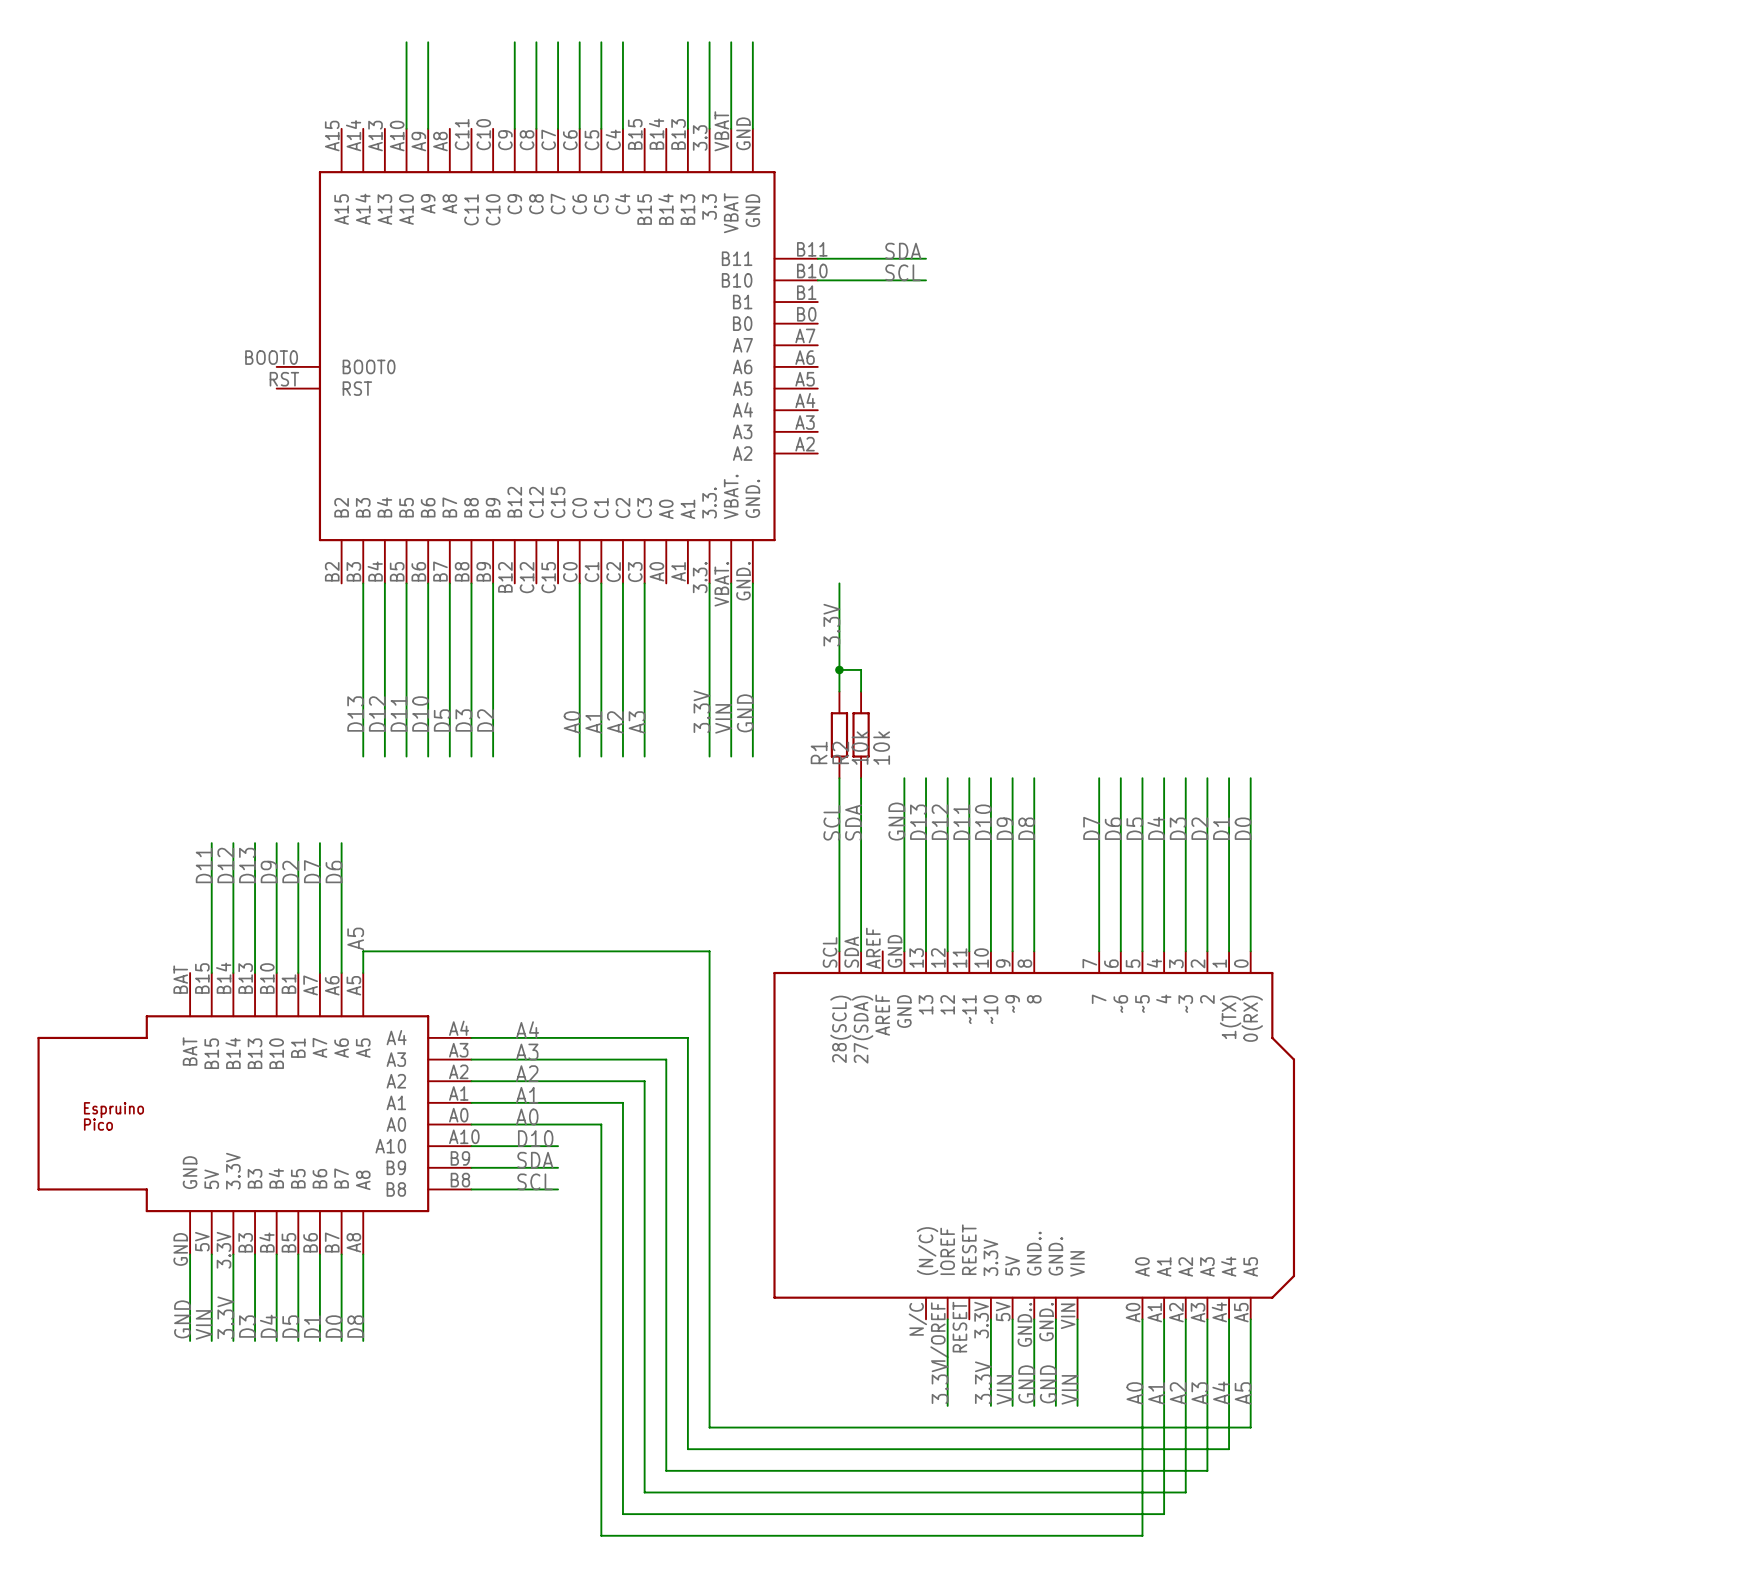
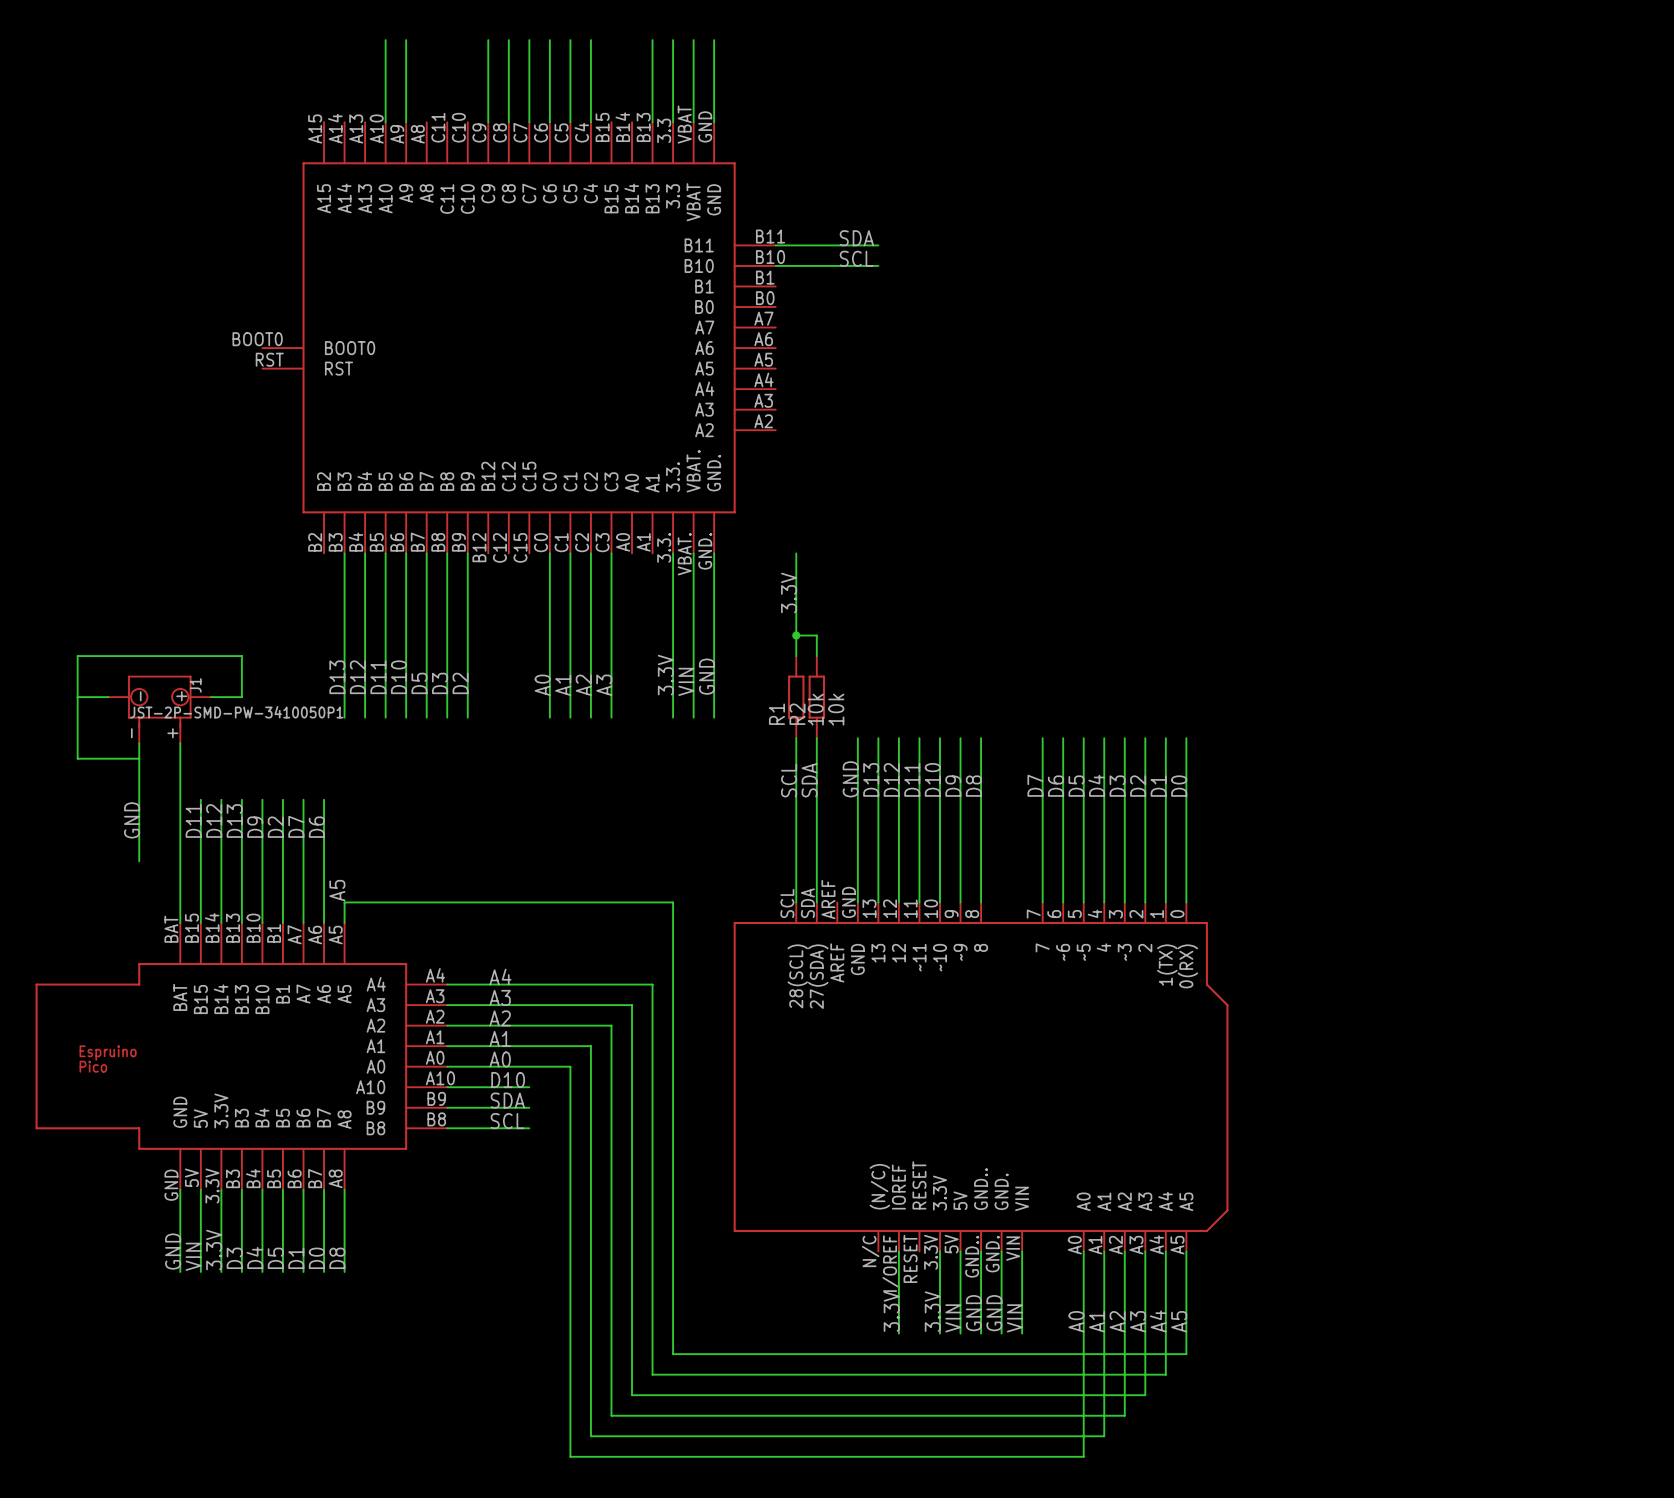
wire: none -> (77, 697) (108, 697)
wire: none -> (211, 697) (241, 697) (241, 656) (77, 656) (77, 758) (139, 758)
J1: none -> JST-2P-SMD-PW-3410050P1 (159, 709)
wire: none -> (139, 743) (139, 861)
wire: none -> (180, 743) (180, 922)
label: none -> GND (132, 820)

